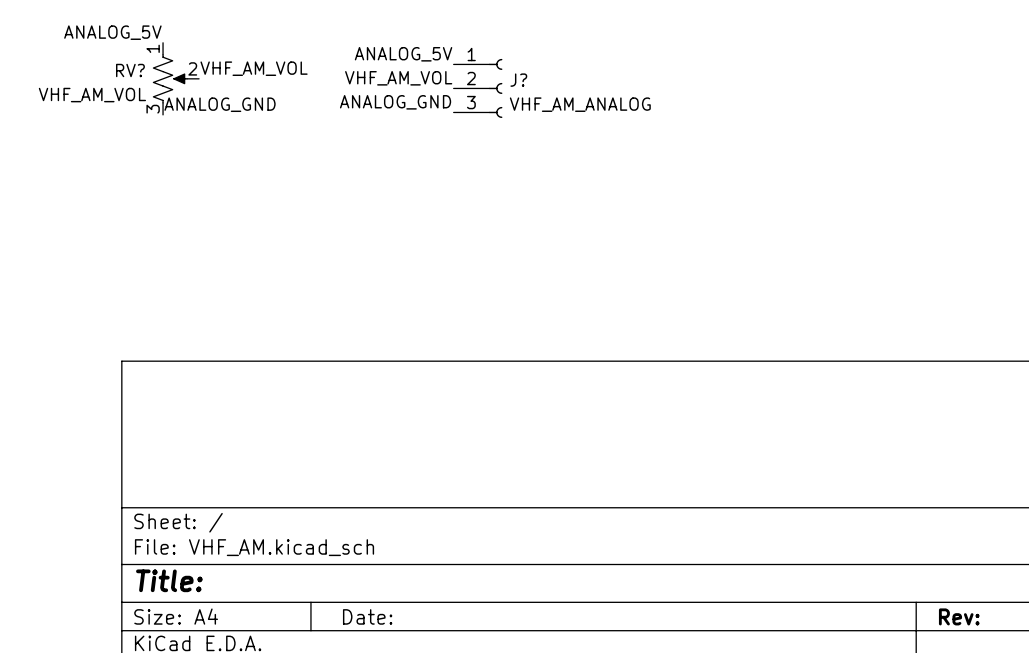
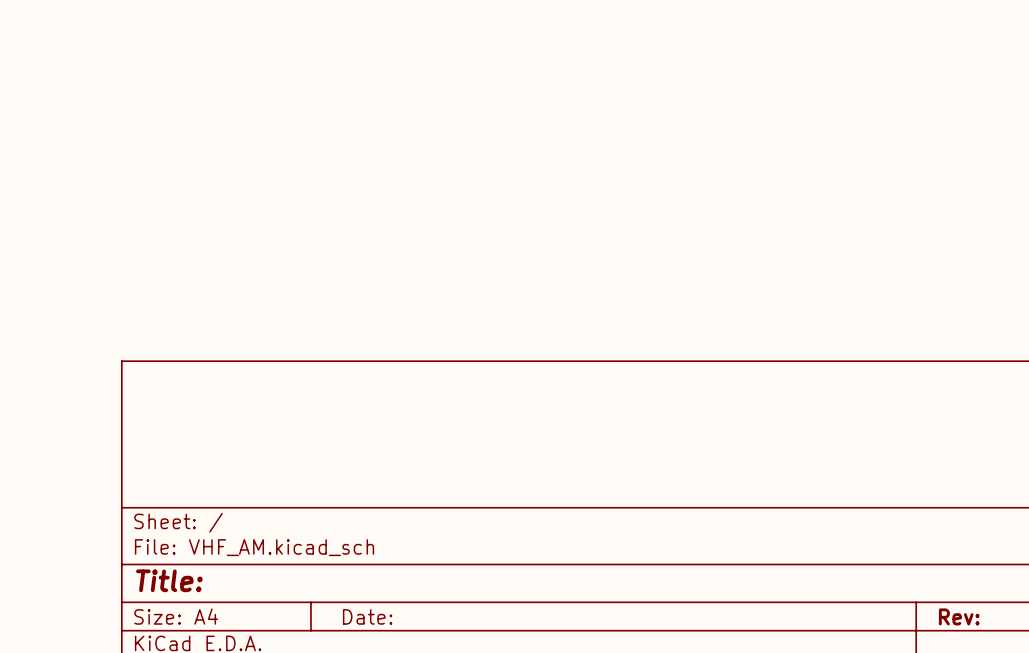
label: ANALOG_5V (112, 32) -> none
label: ANALOG_5V (403, 54) -> none
label: VHF_AM_VOL (254, 68) -> none
RV?: VHF_AM_VOL (176, 78) -> none
label: VHF_AM_VOL (398, 78) -> none
J?: VHF_AM_ANALOG (478, 88) -> none
label: ANALOG_GND (395, 102) -> none
label: ANALOG_GND (220, 104) -> none

